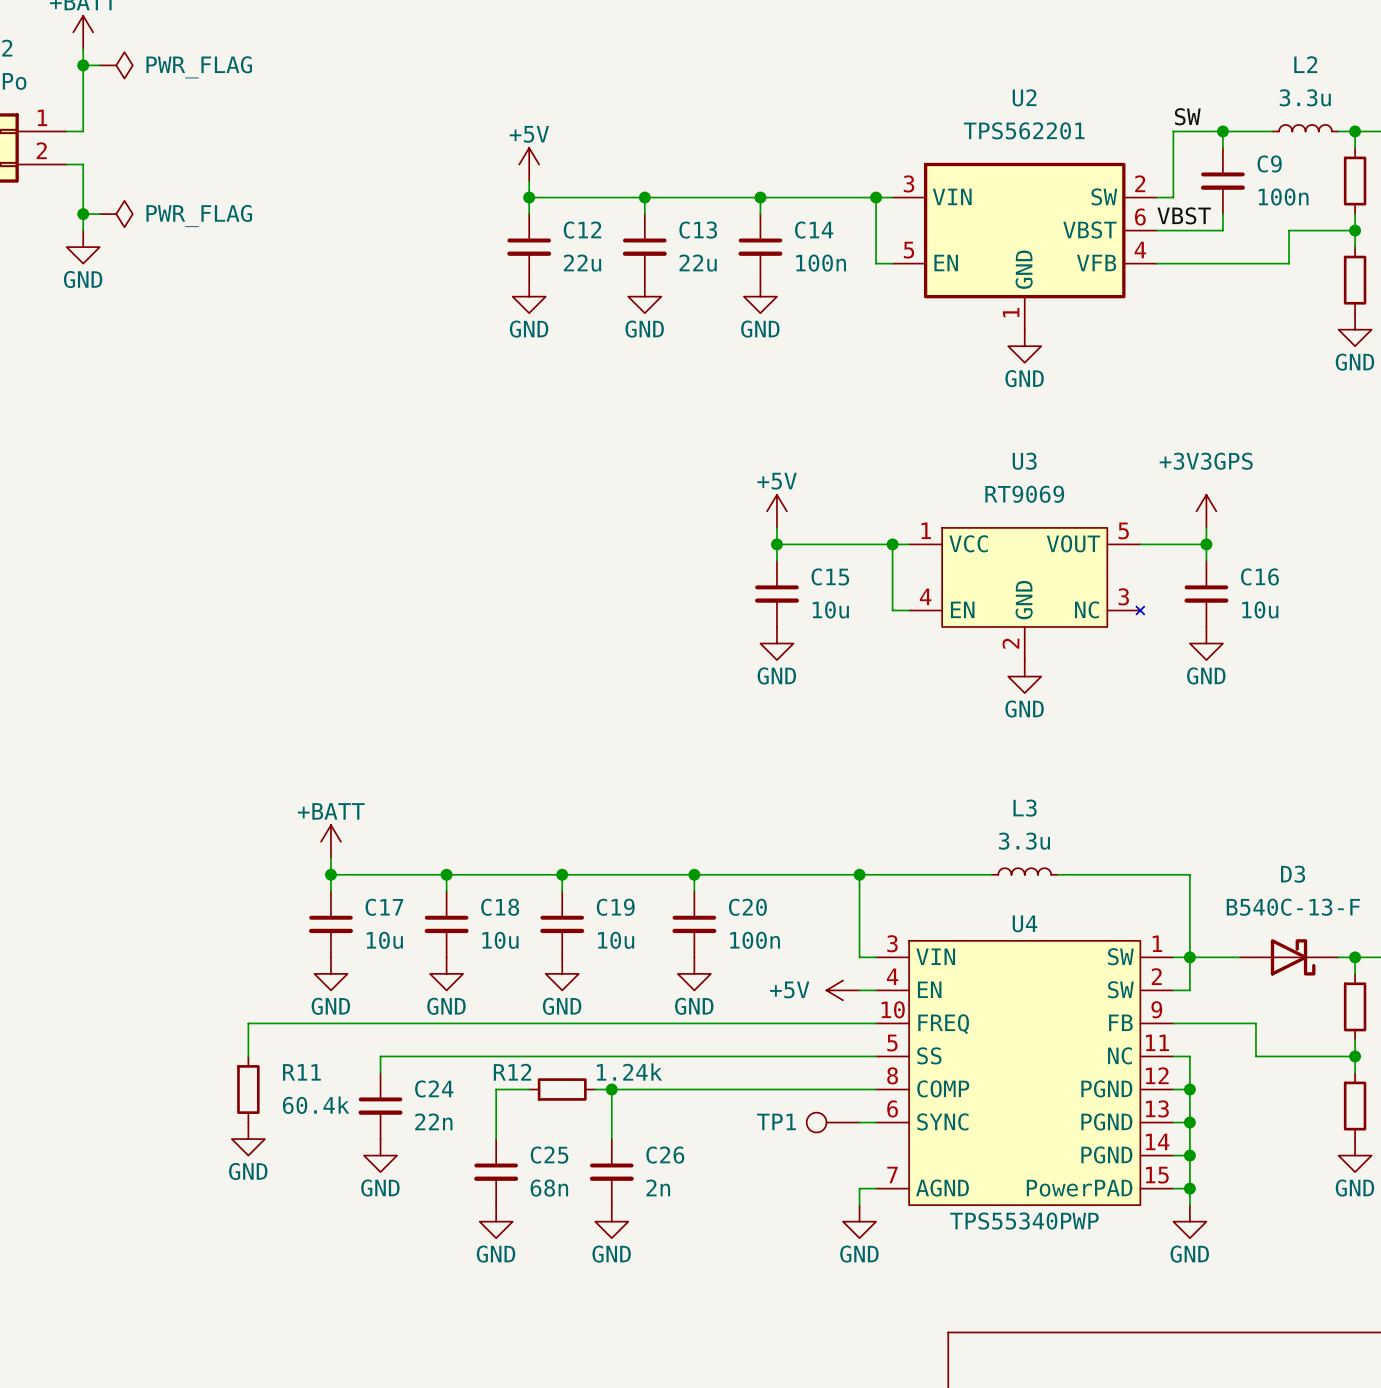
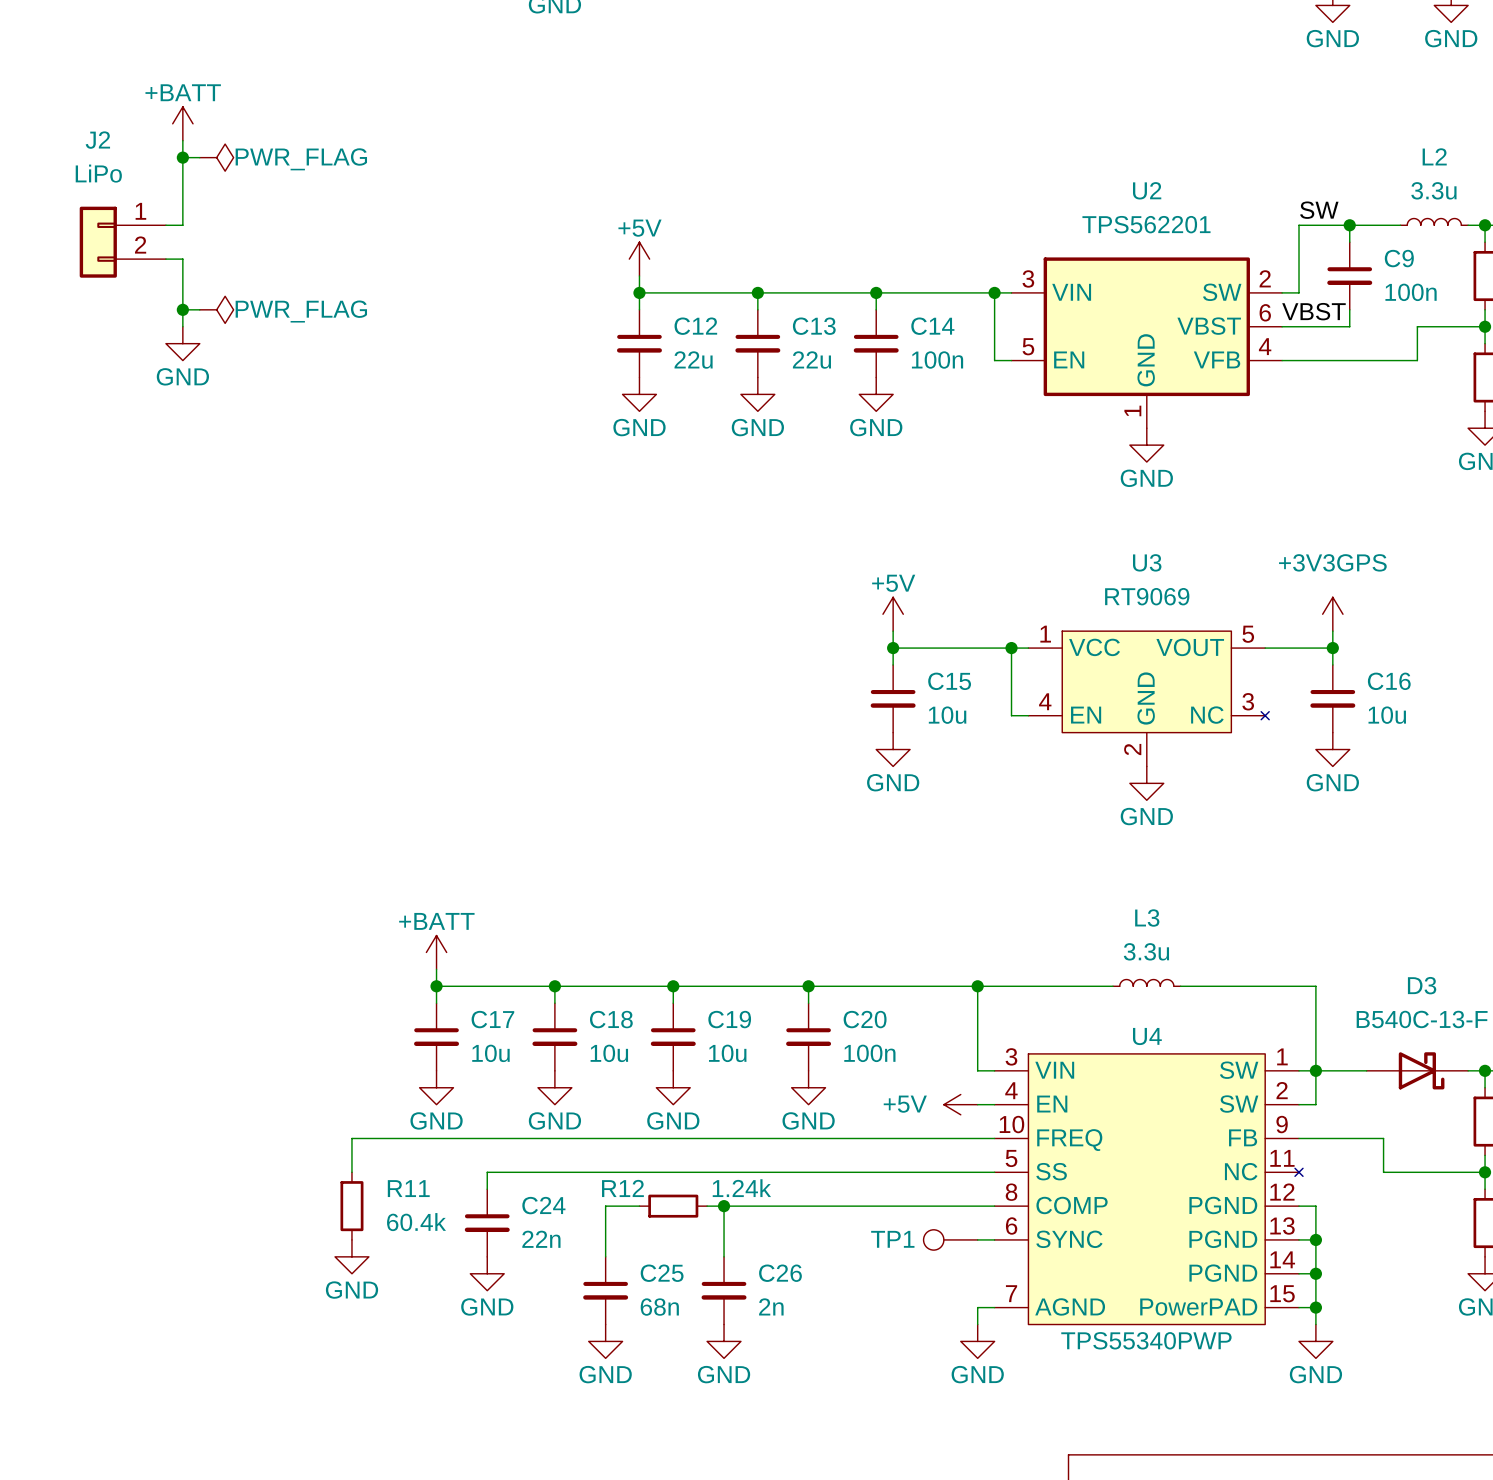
U4 symbol: [876, 940, 1174, 1206] -> [994, 1053, 1304, 1325]
wire: (1173, 1056) (1189, 1056) (1189, 1089) -> none
junction: (1189, 1089) -> none

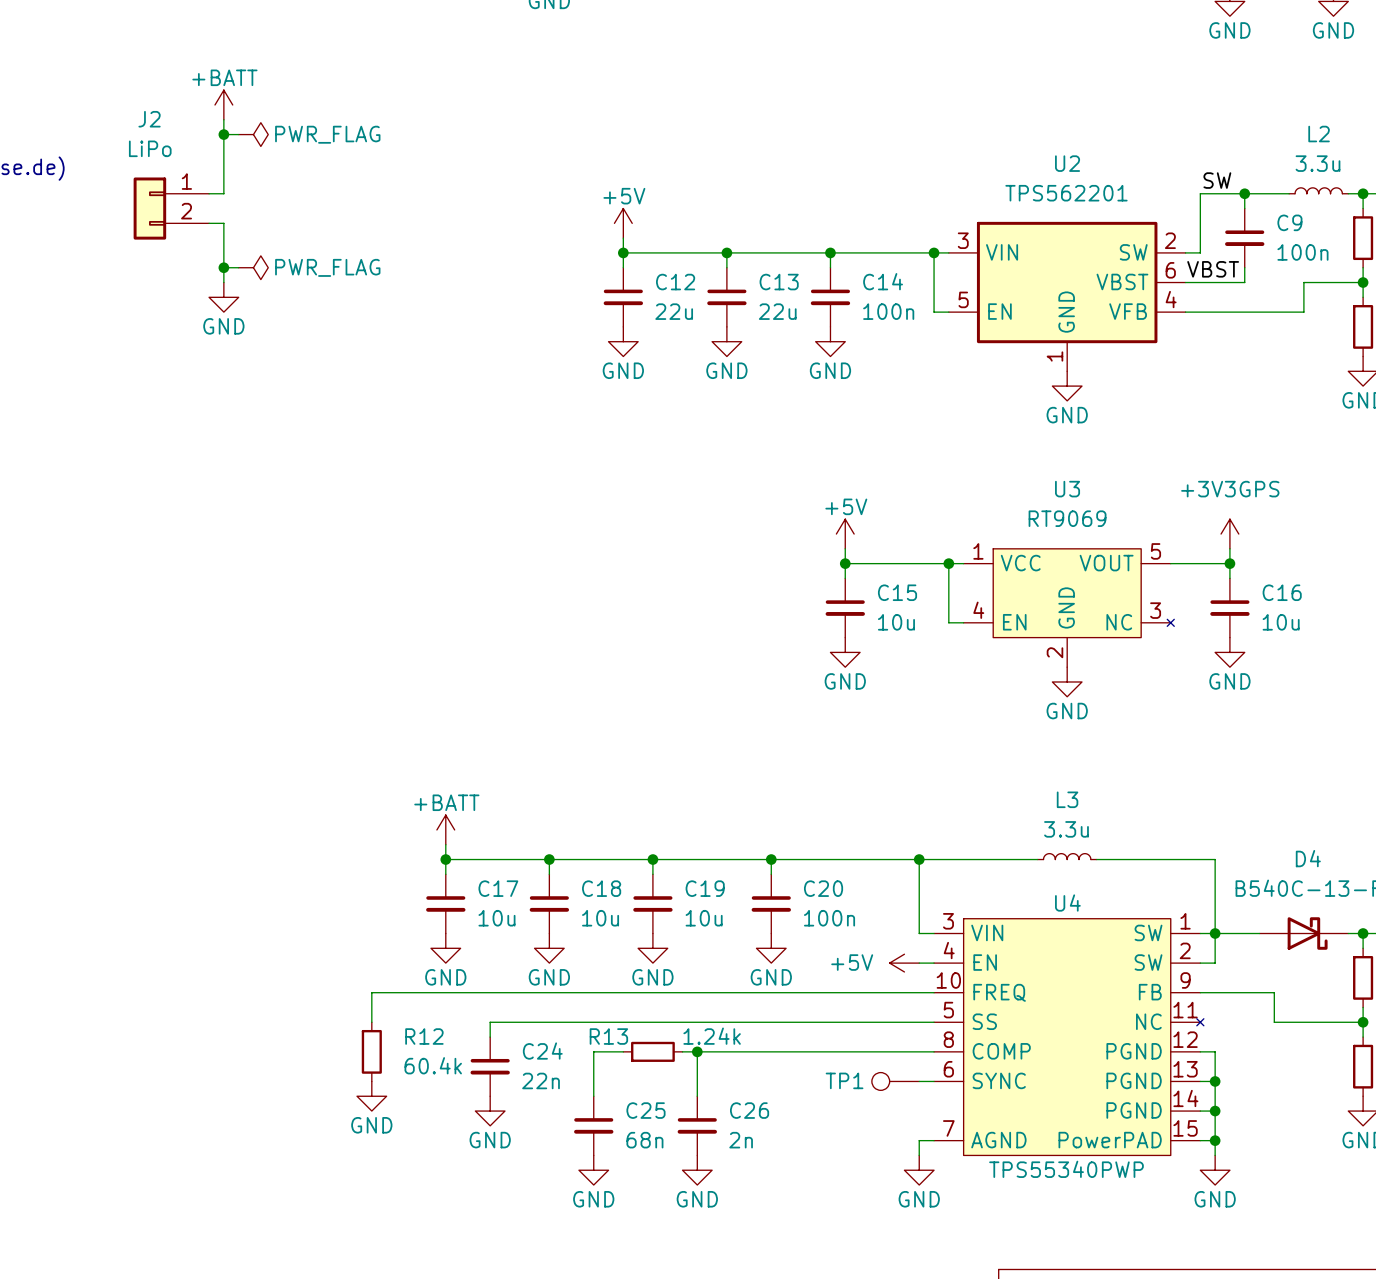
D3 name: D3 (1422, 985) -> D4 (1308, 858)
R11 name: R11 (408, 1188) -> R12 (424, 1036)
R12 name: R12 (622, 1188) -> R13 (608, 1036)

